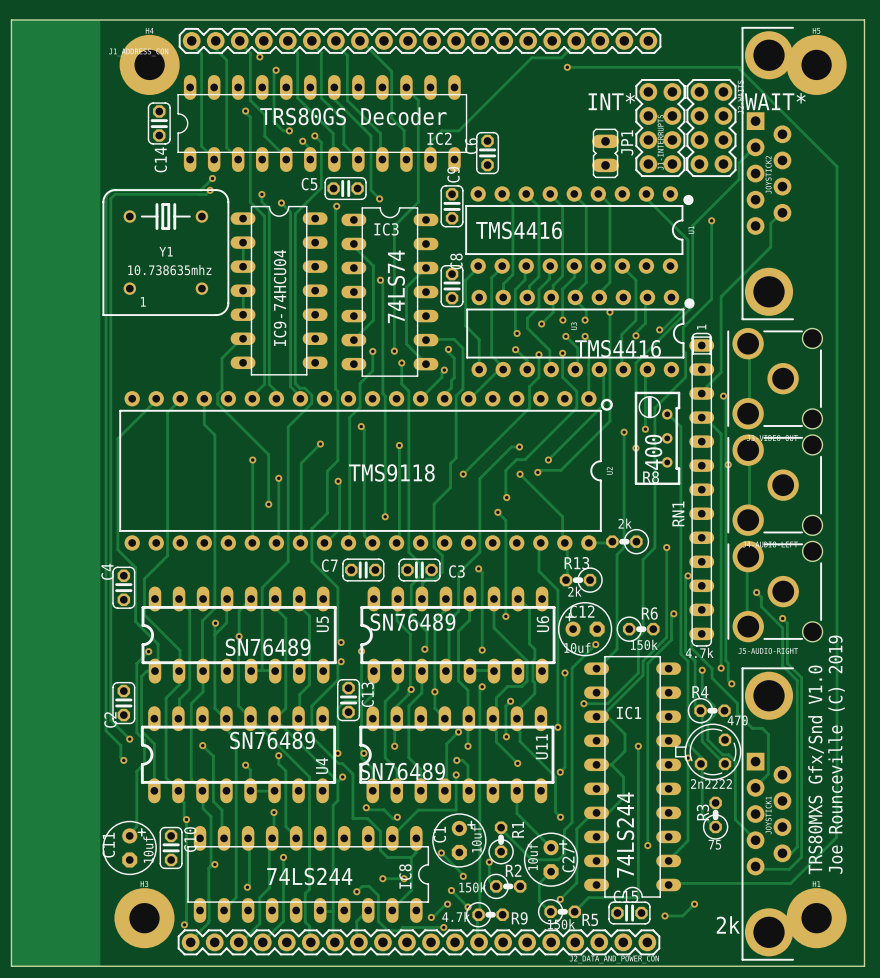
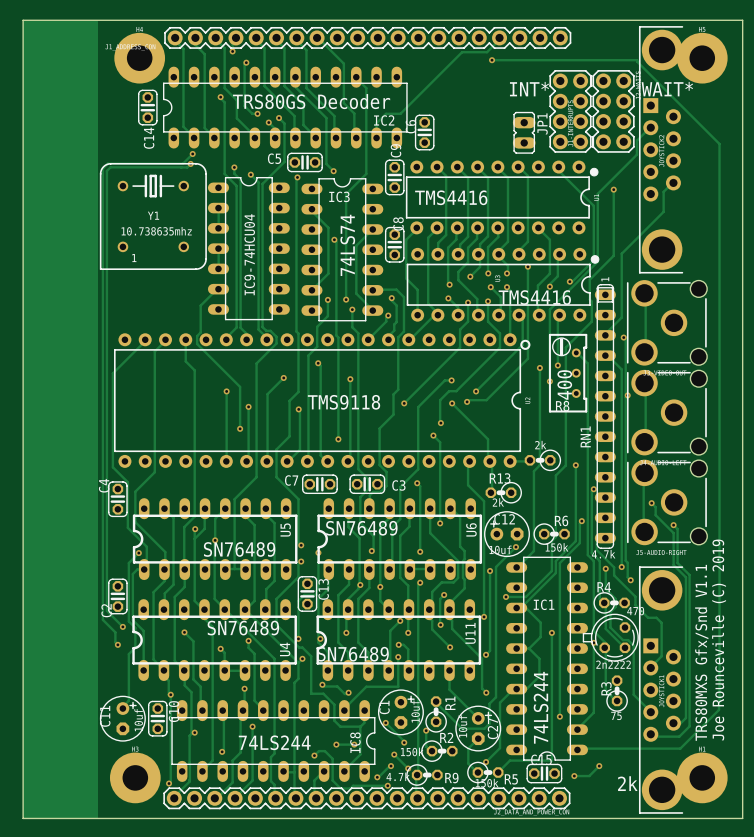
text: TRS80MXS Gfx/Snd V1.0 (816, 769) -> TRS80MXS Gfx/Snd V1.1 (701, 652)

